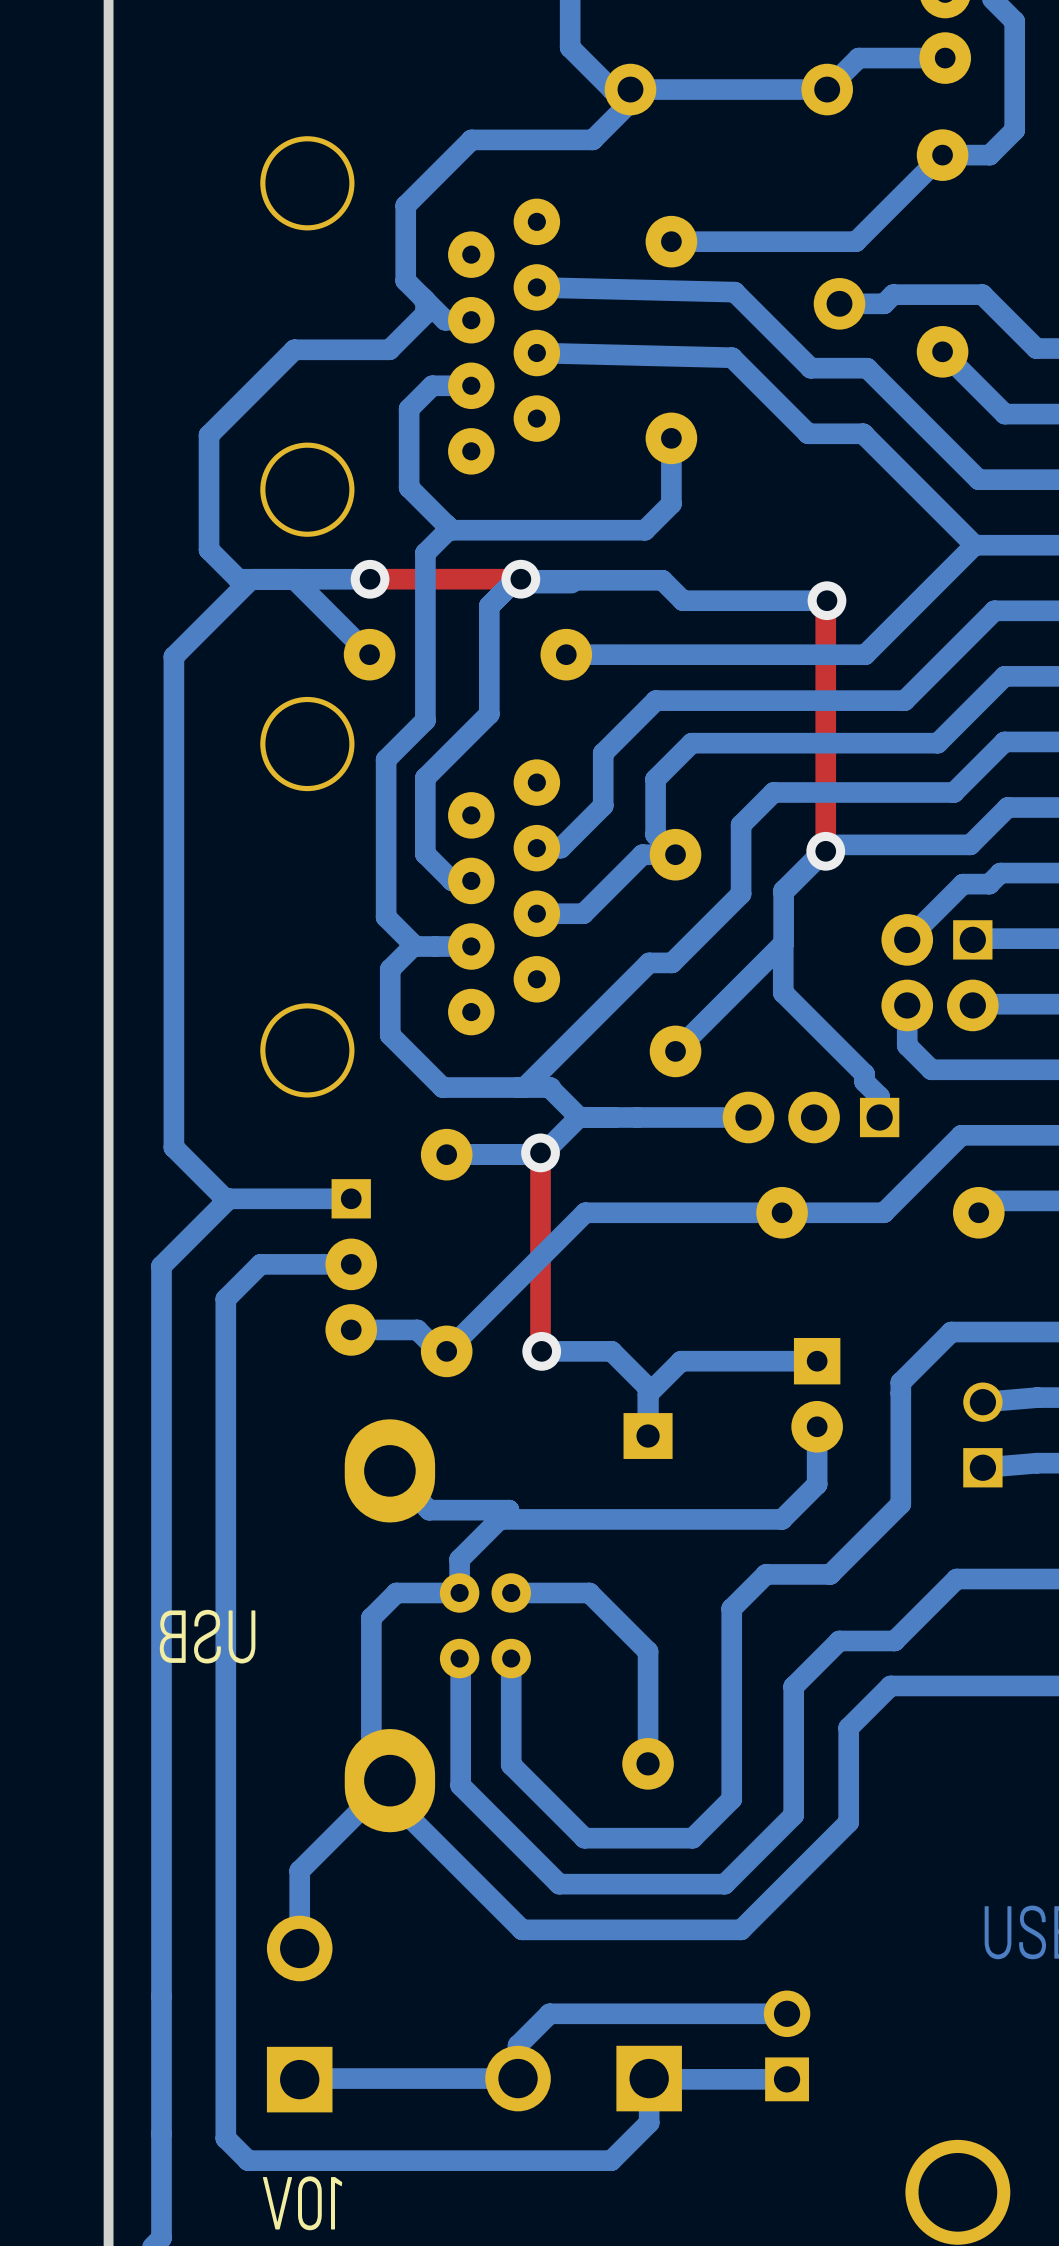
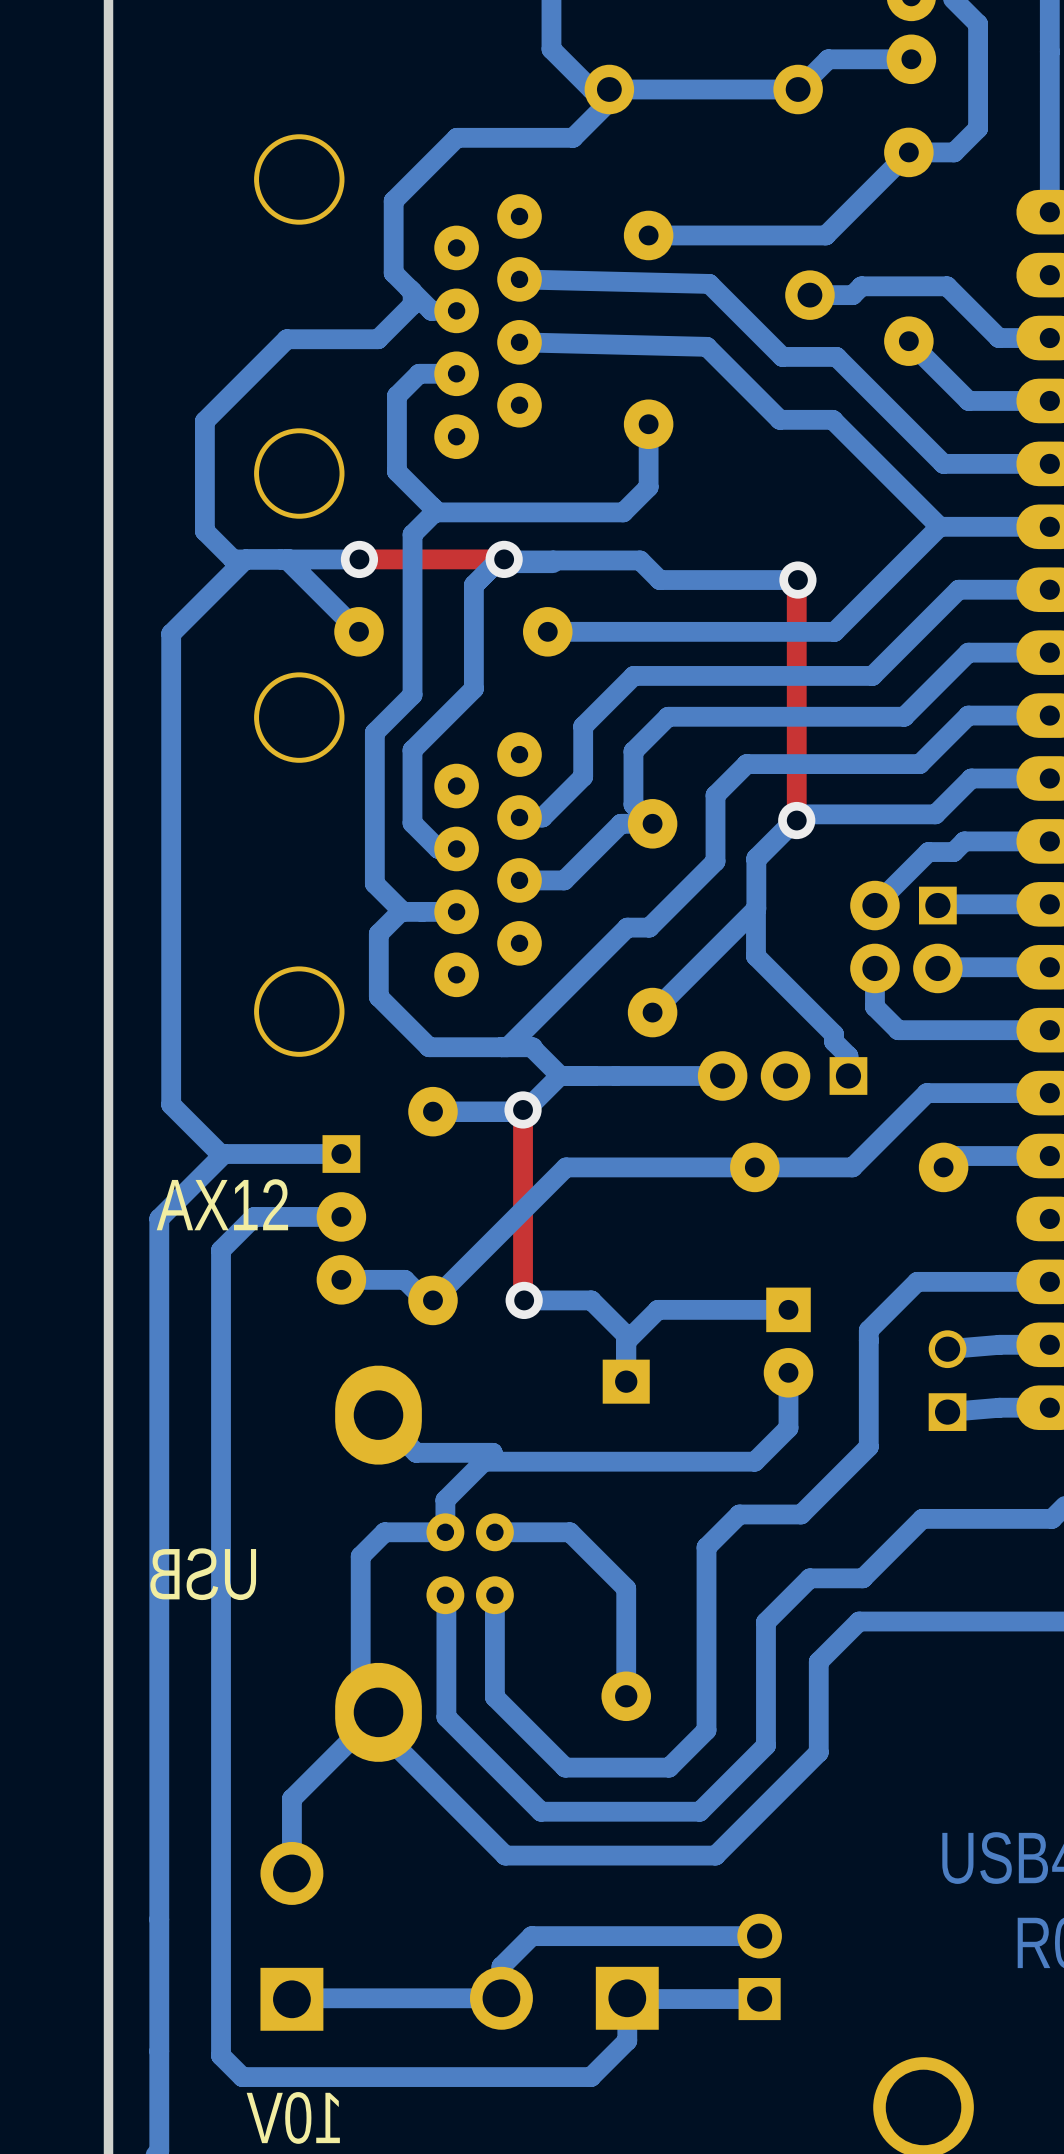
text: none -> AX12 (222, 1204)

